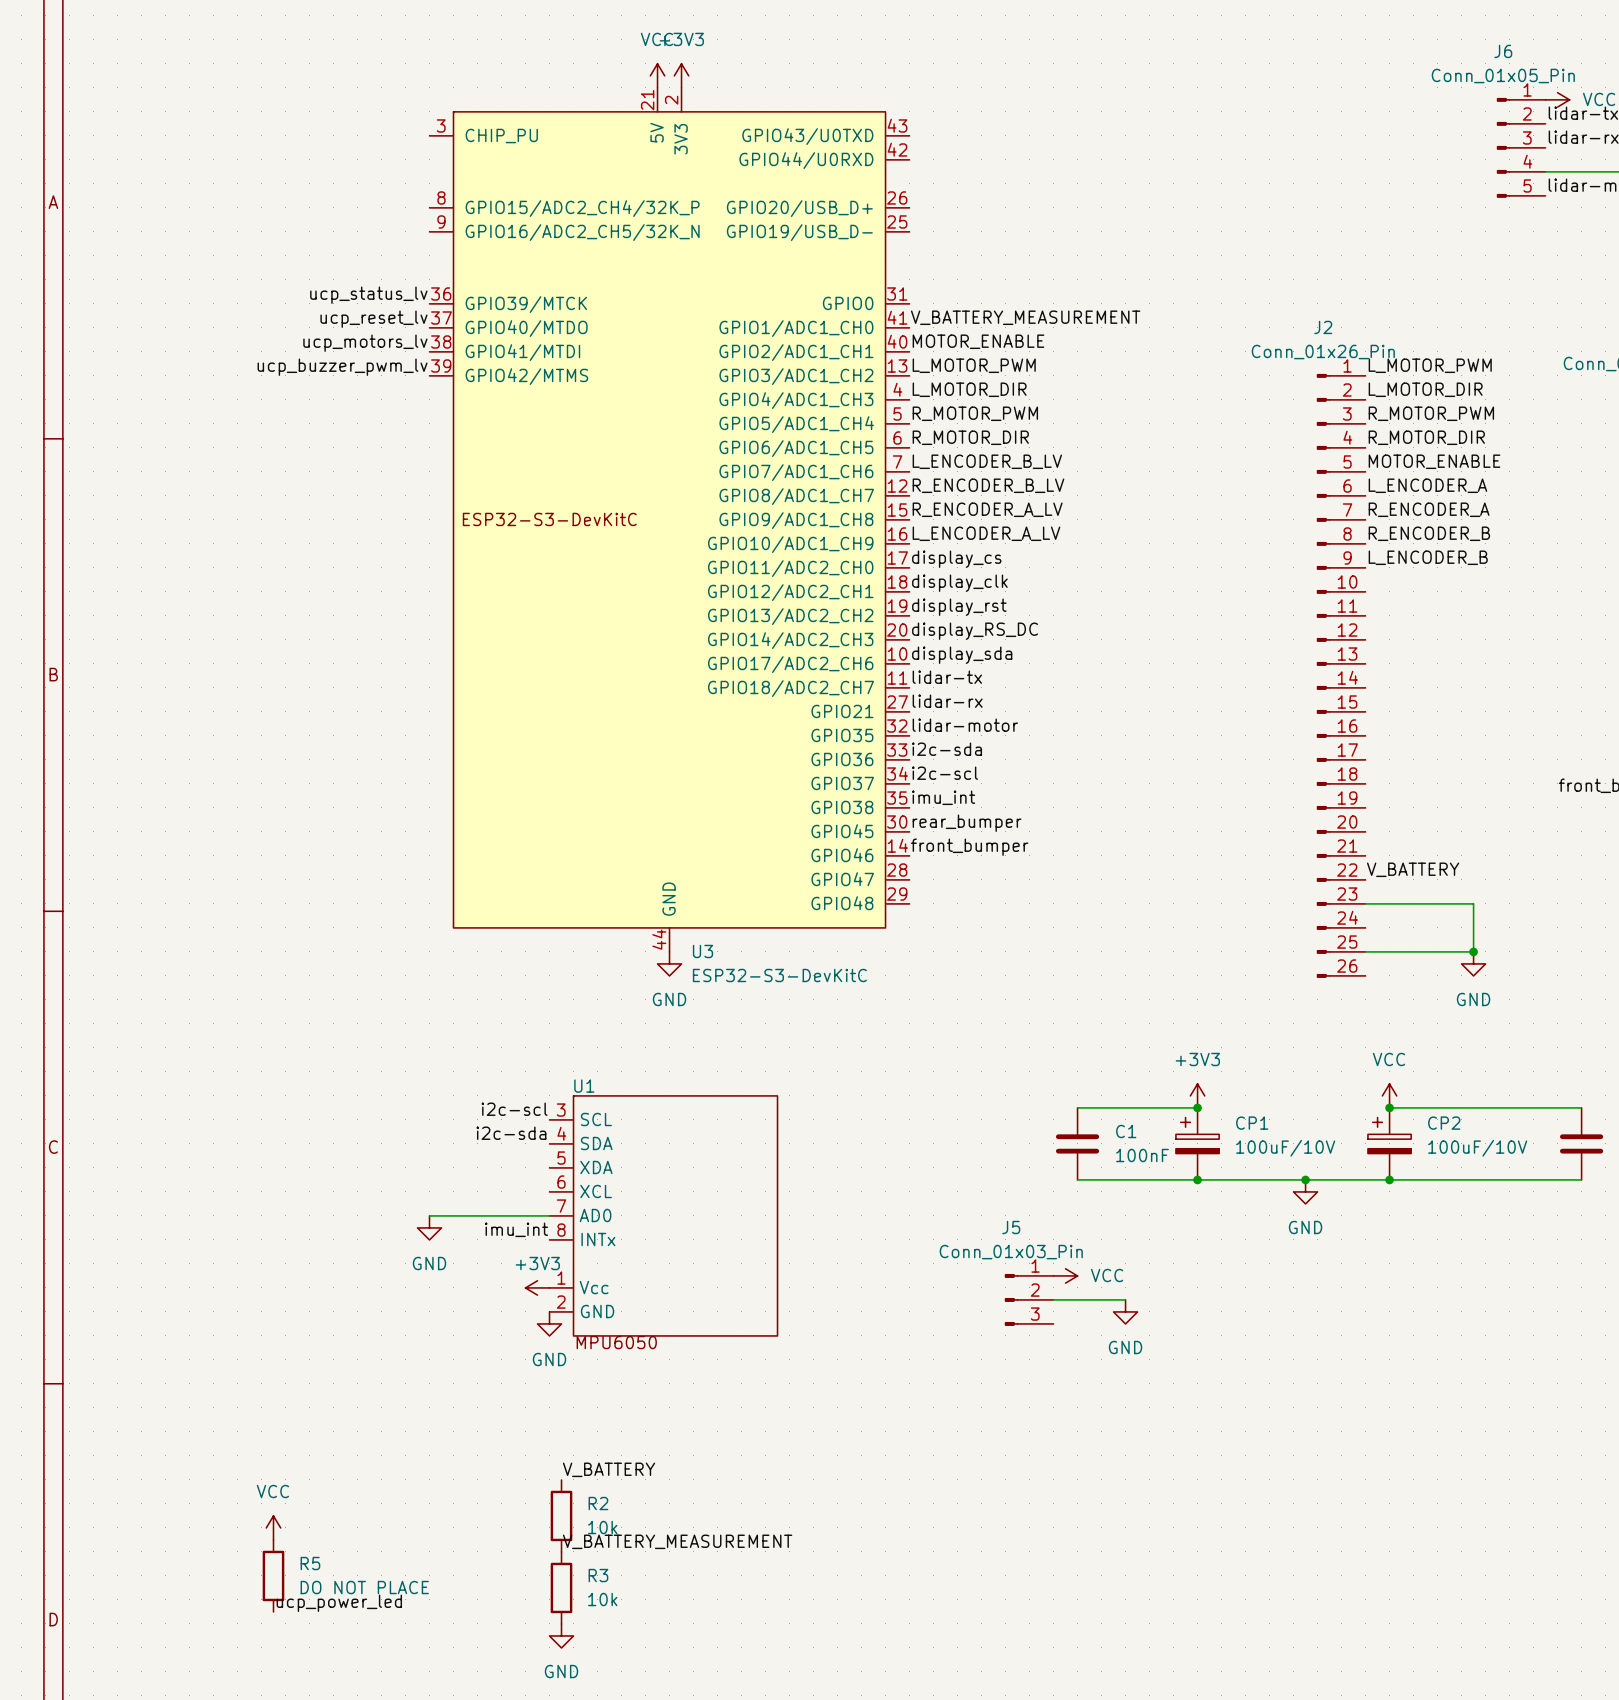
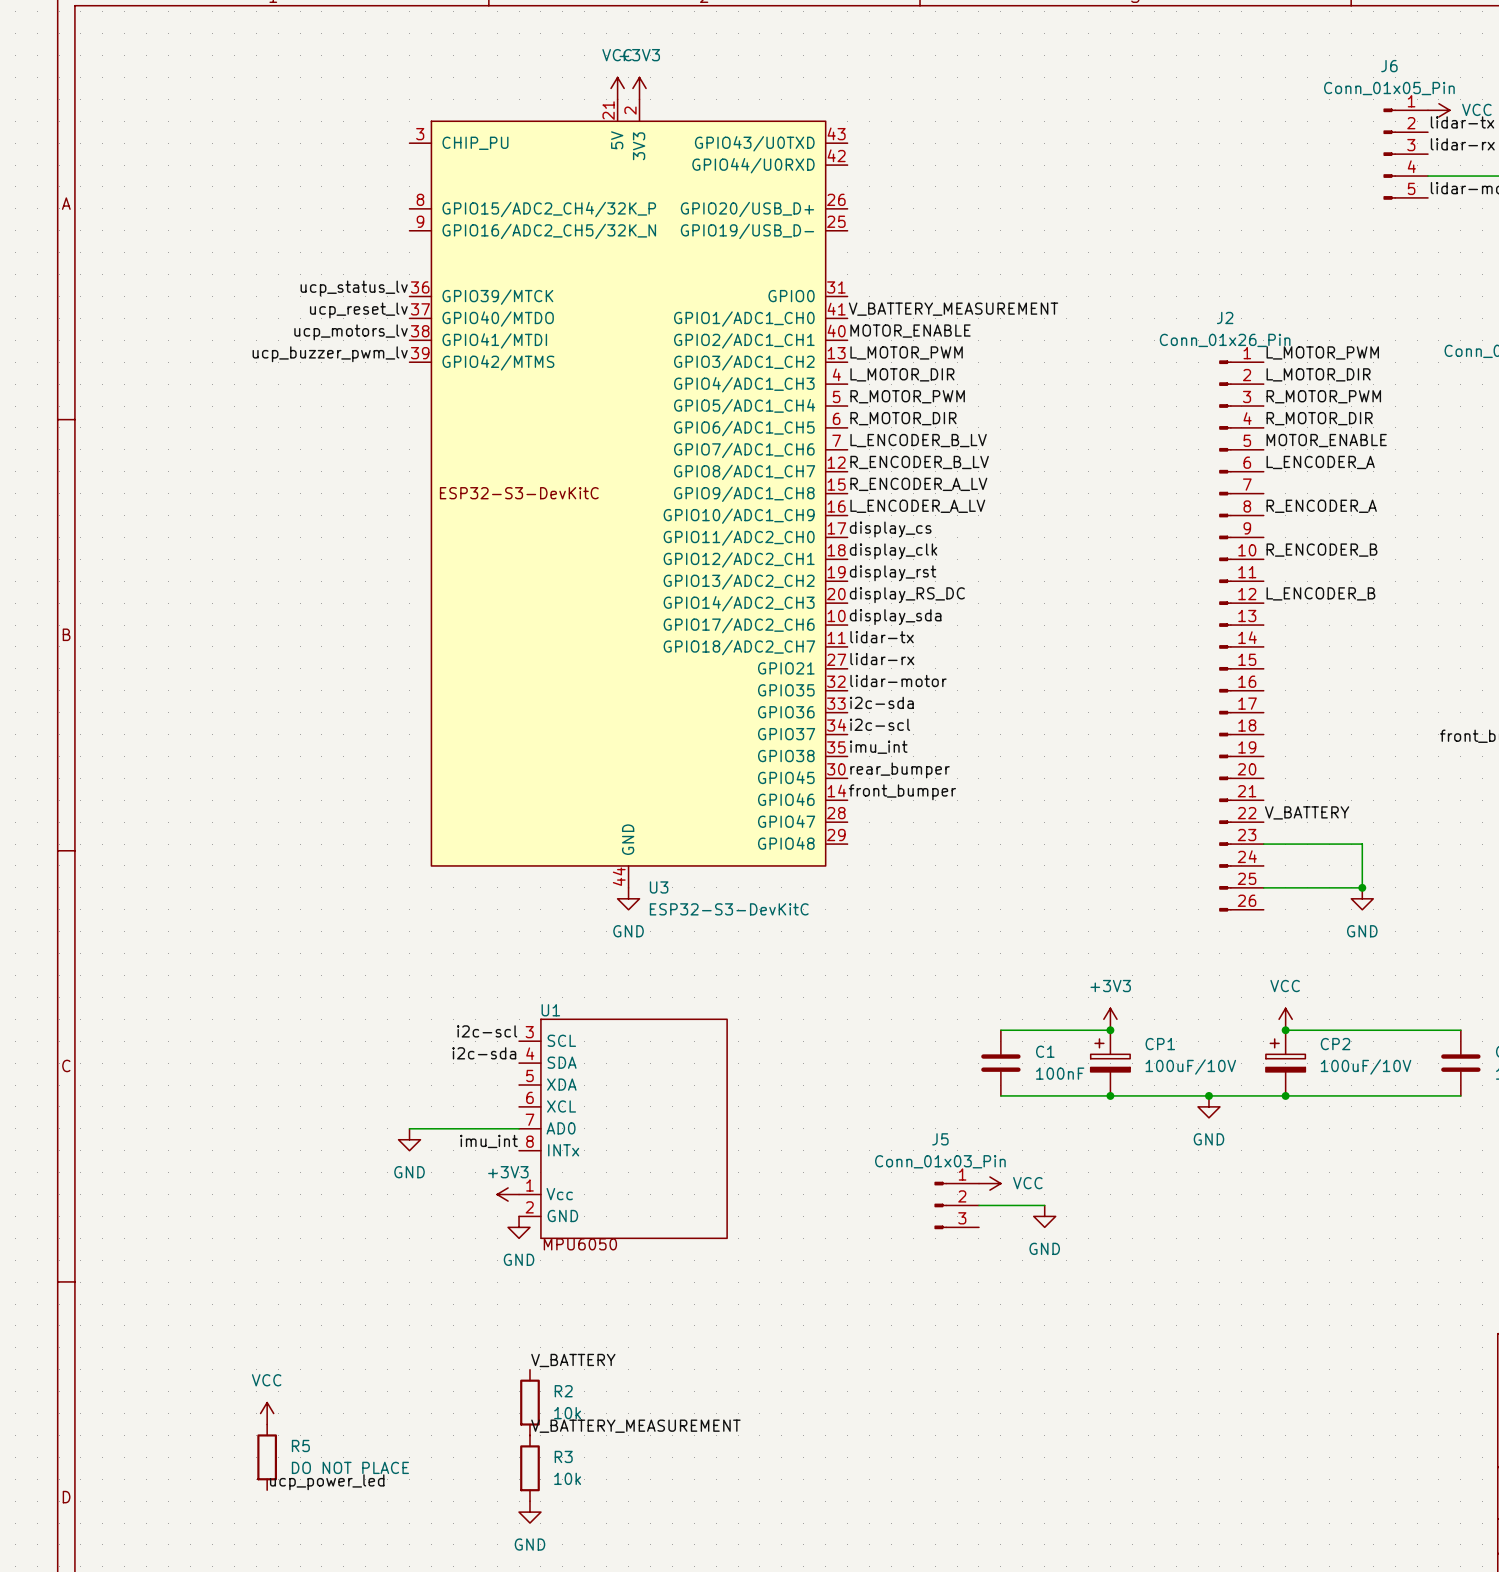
label: R_ENCODER_A (1429, 509) -> none
label: R_ENCODER_B (1429, 533) -> R_ENCODER_A (1321, 506)
label position: L_ENCODER_B (1428, 557) -> L_ENCODER_B (1320, 593)
label: none -> R_ENCODER_B (1321, 550)

